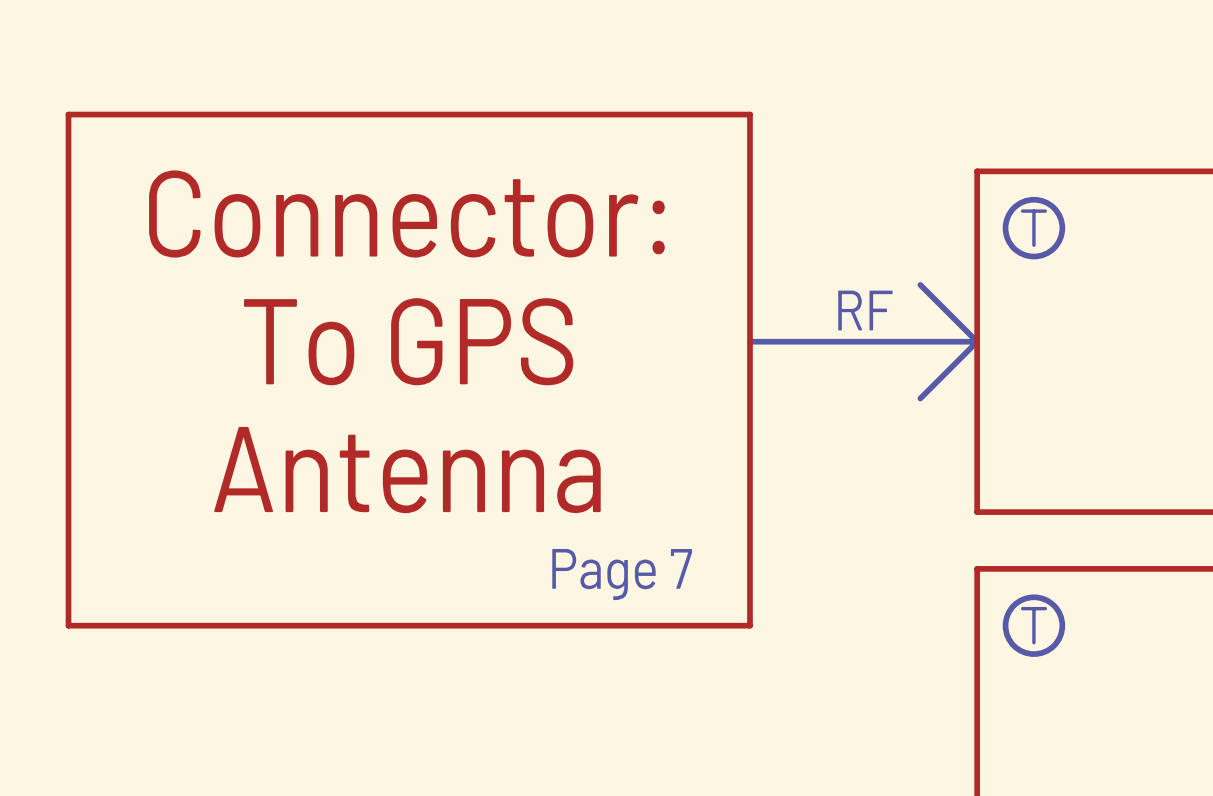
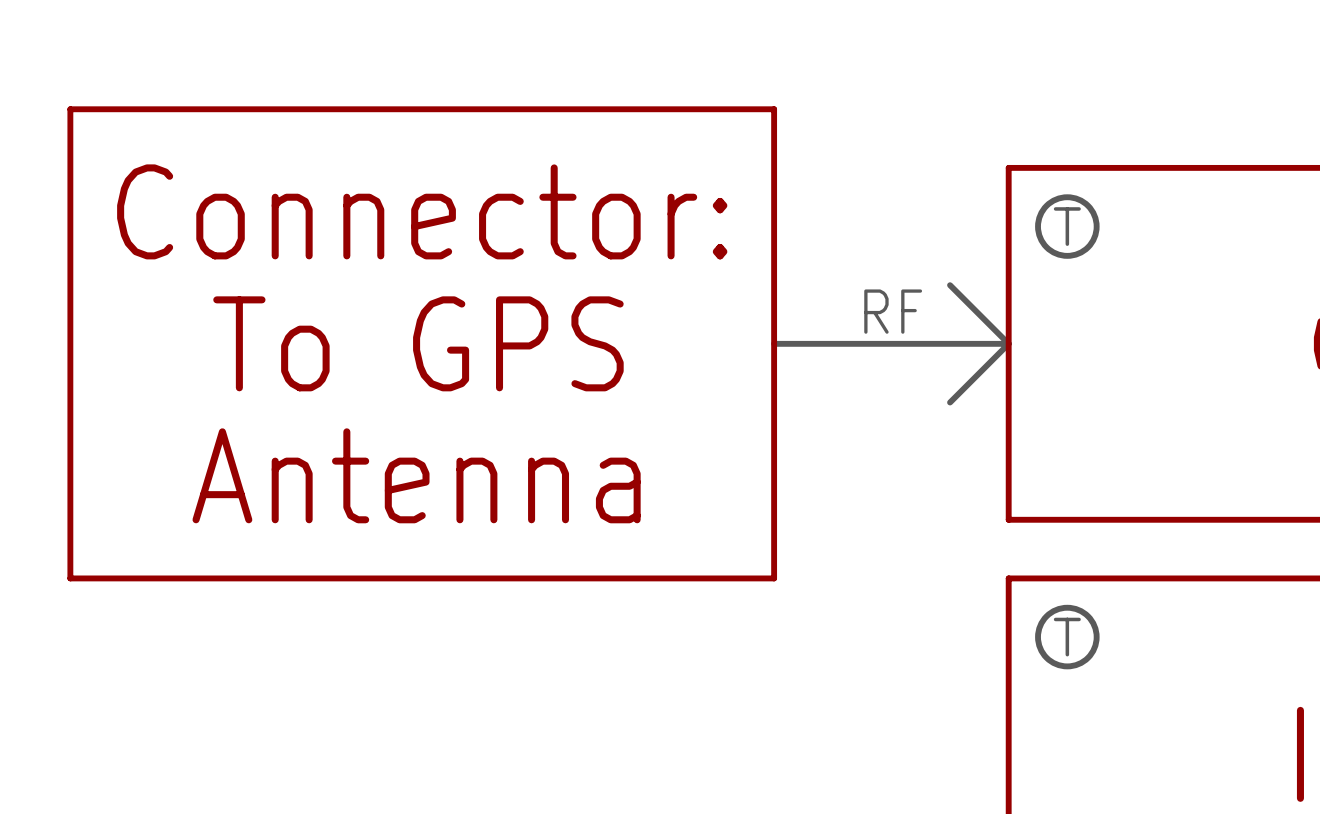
line: (68, 568) (68, 625) (749, 625) (749, 568) -> (70, 578) (774, 578)
text: Page 7 (622, 574) -> none

